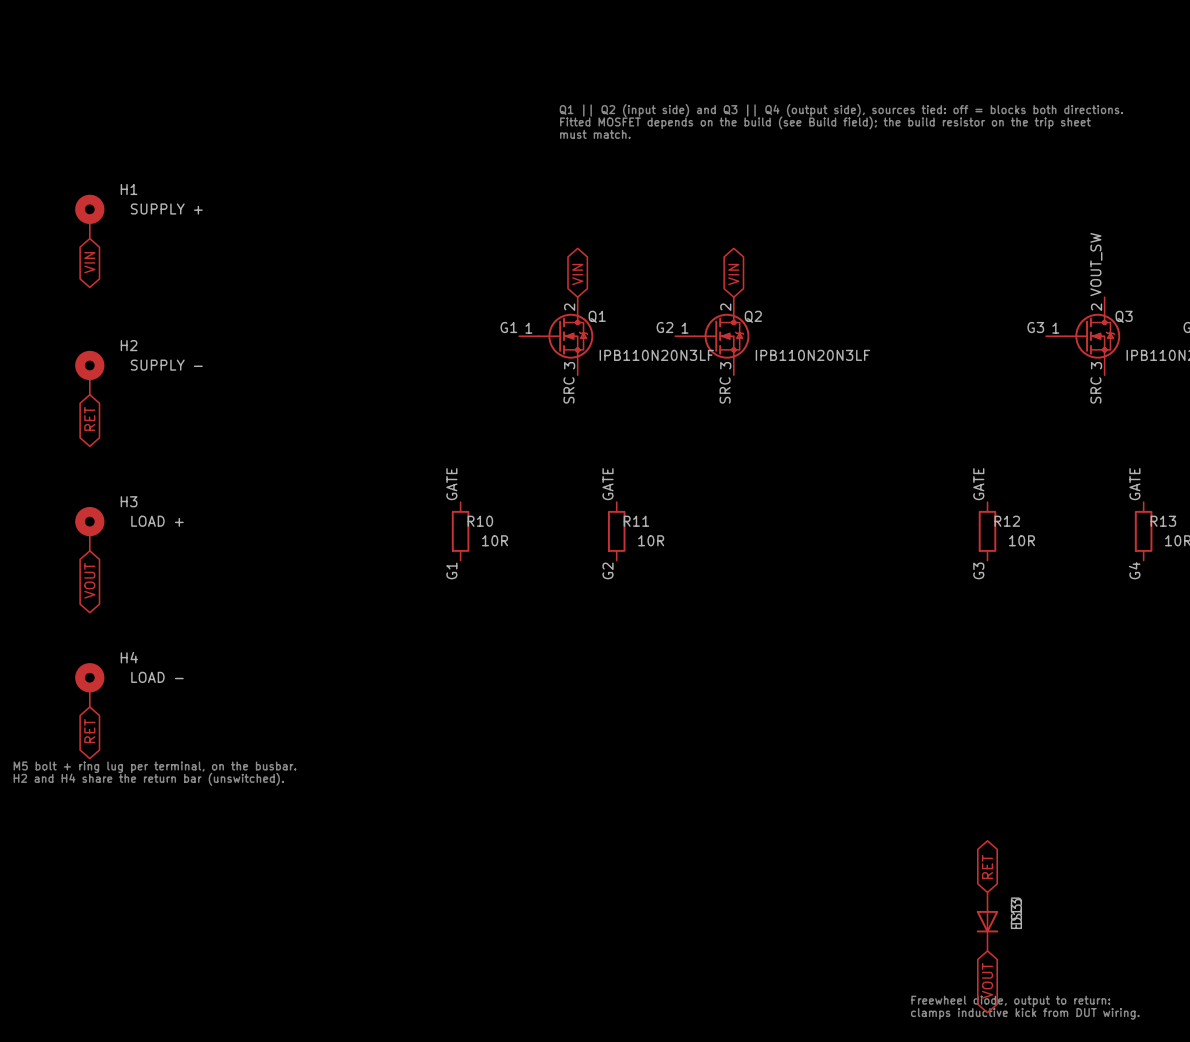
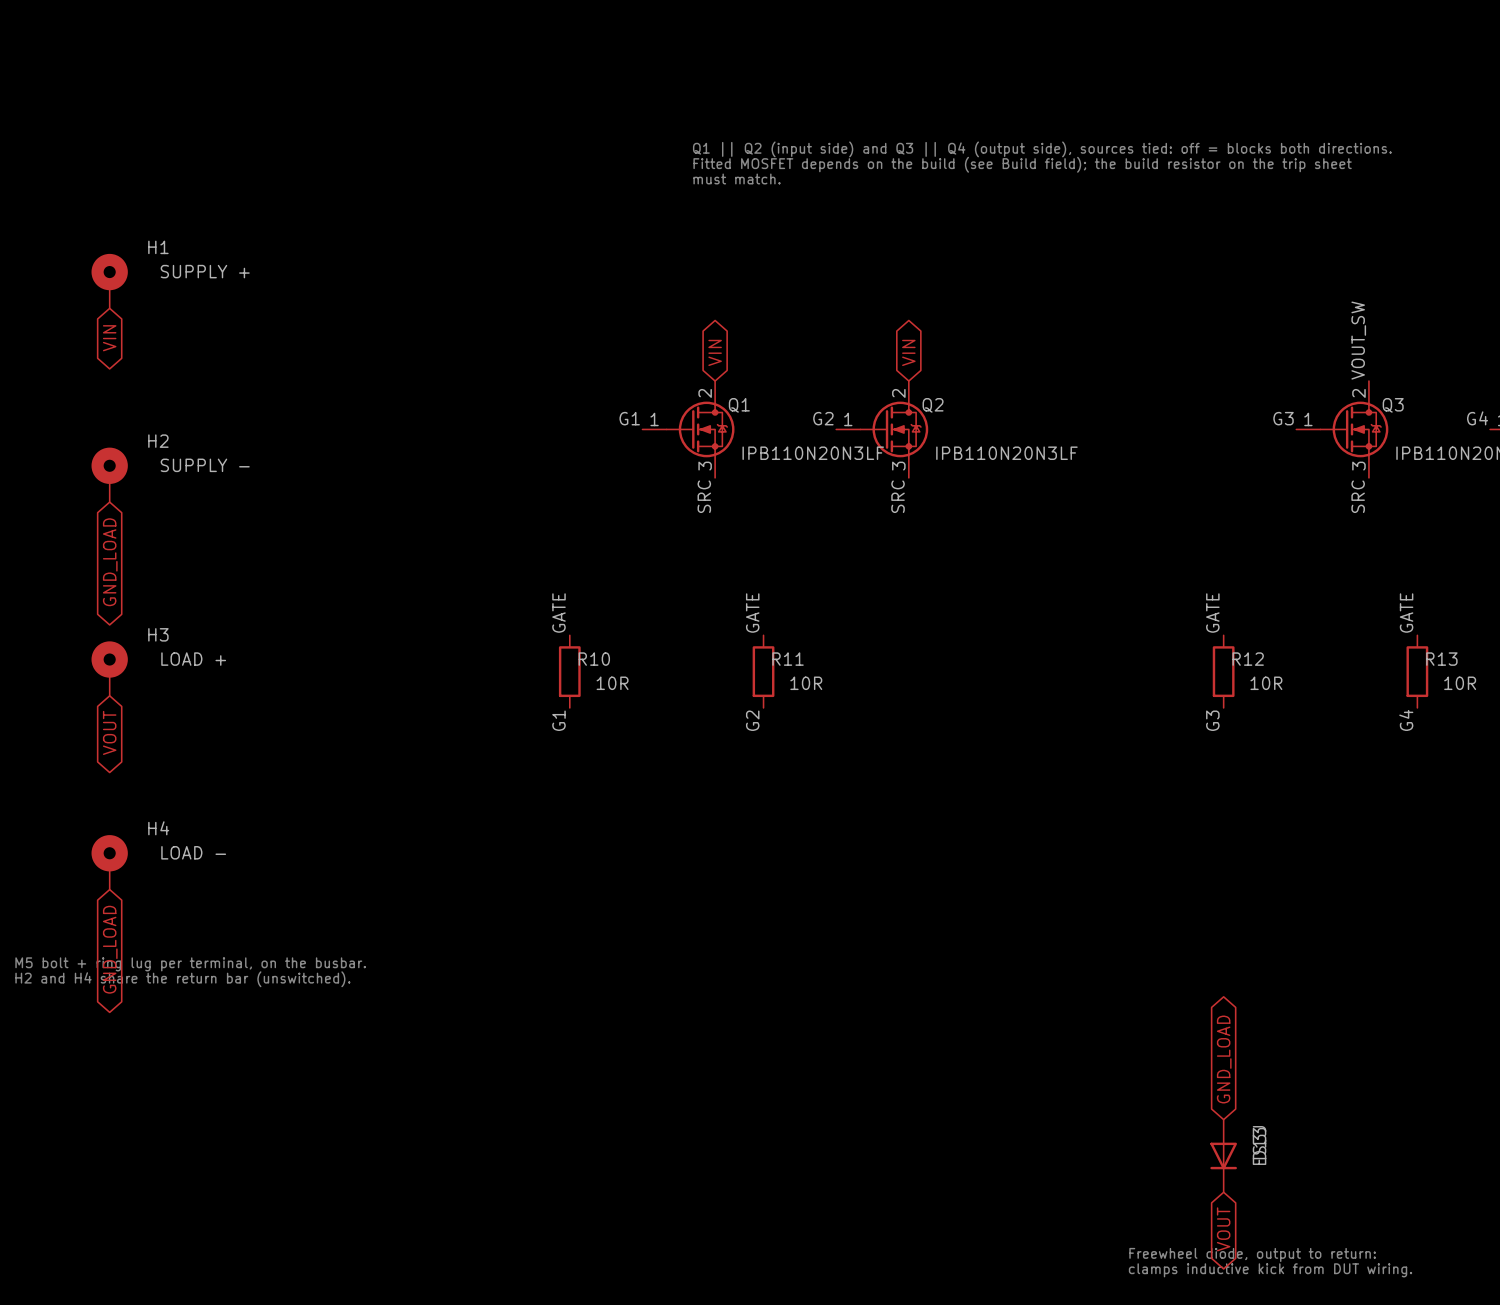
global label: RET (89, 418) -> GND_LOAD (110, 562)
global label: RET (89, 731) -> GND_LOAD (110, 949)
global label: RET (987, 866) -> GND_LOAD (1224, 1059)

